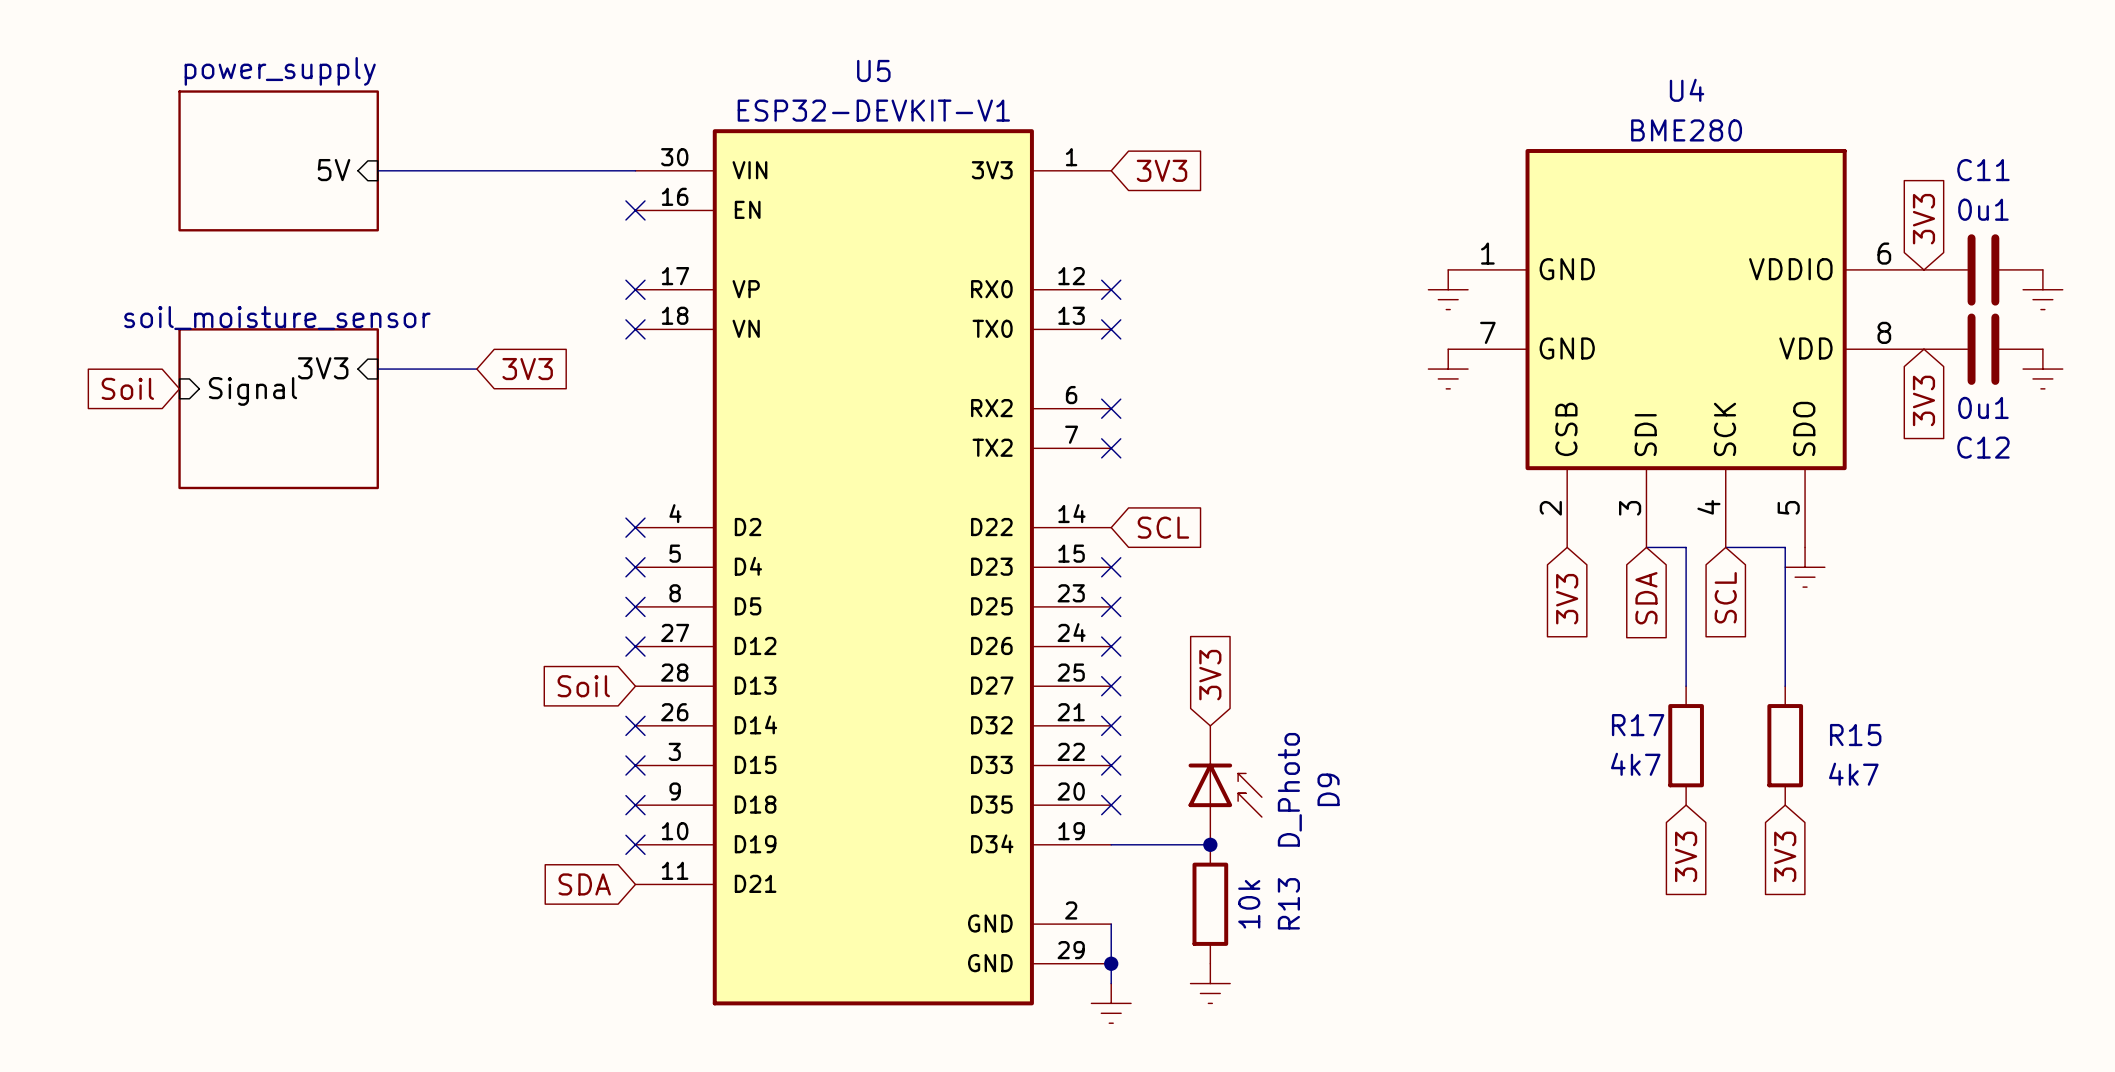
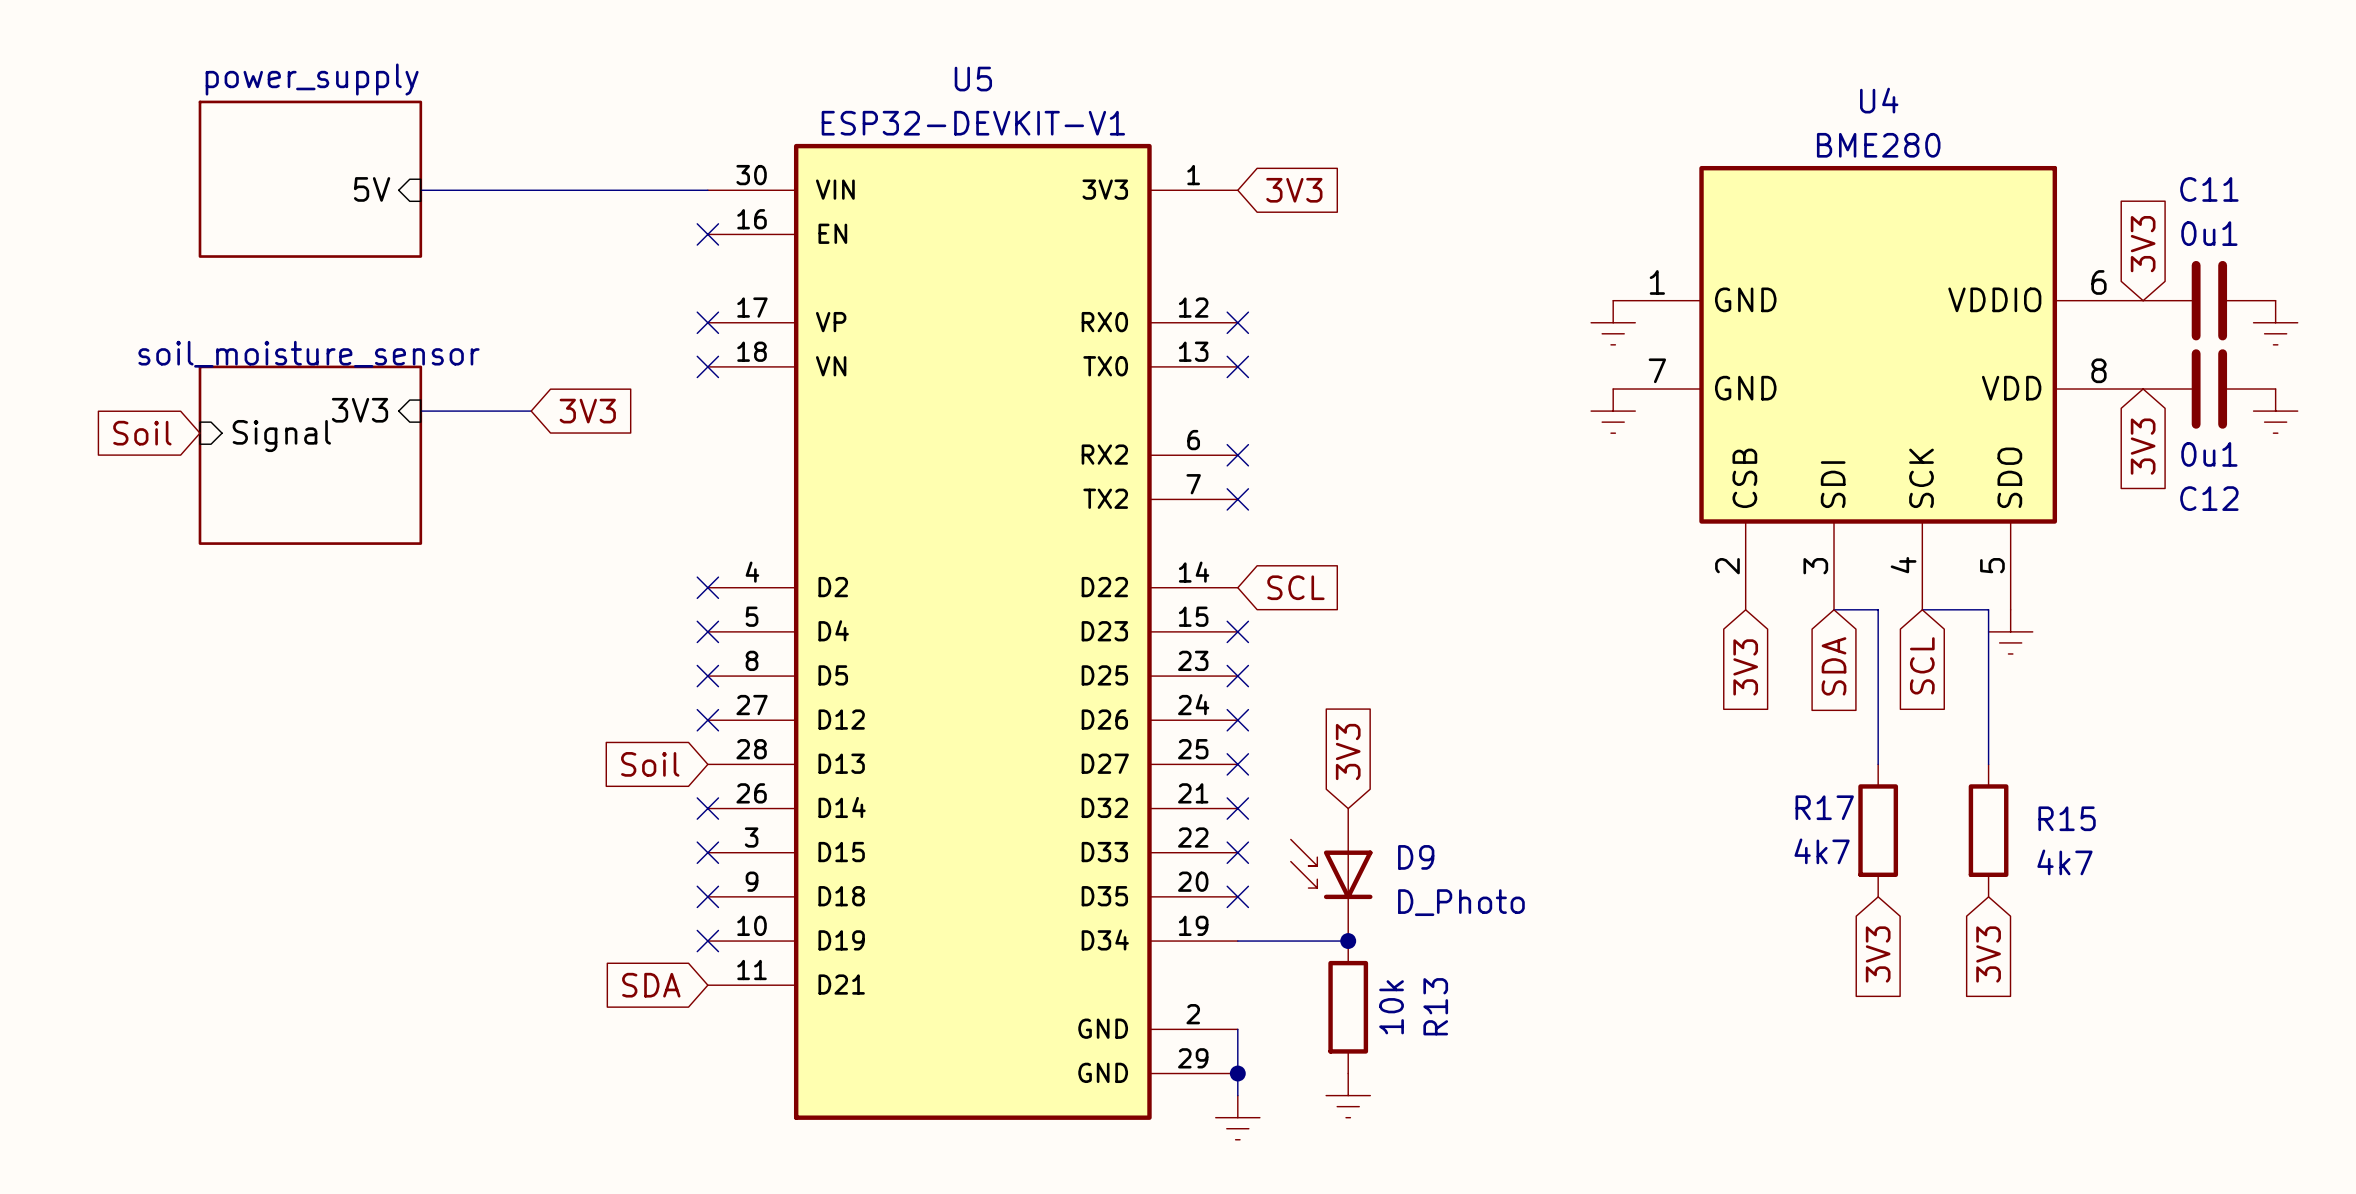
D9 value position: D_Photo (1289, 789) -> D_Photo (1461, 902)
D9 name position: D9 (1328, 789) -> D9 (1416, 857)
D9 rotation: 0° (1225, 790) -> 180° (1331, 869)

